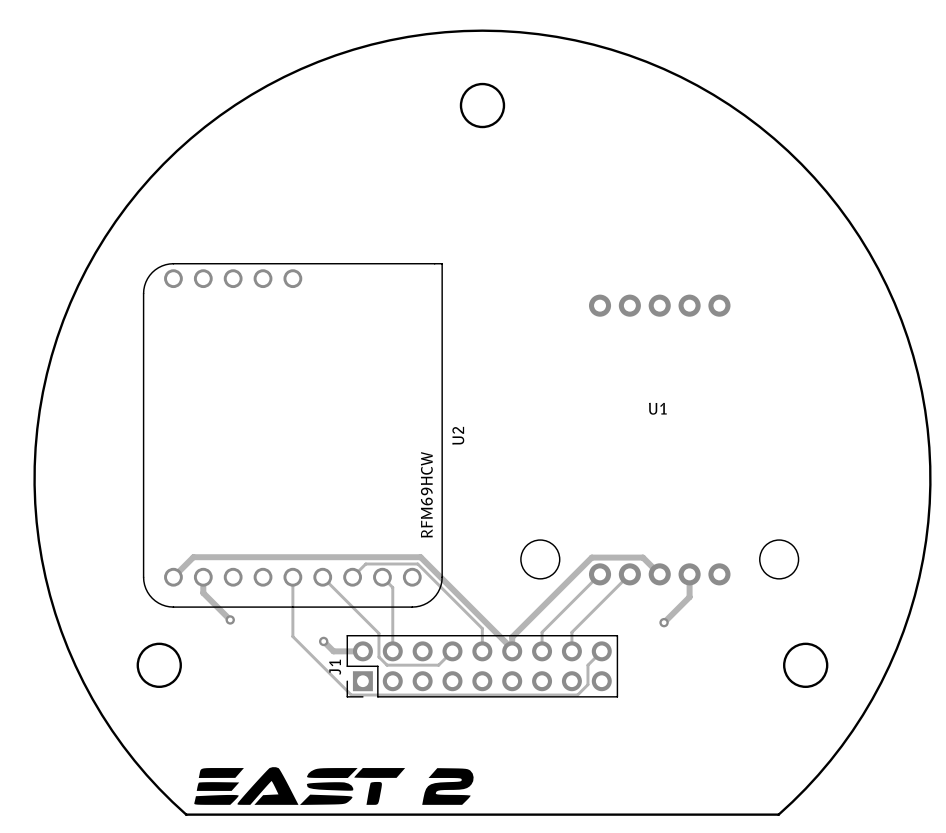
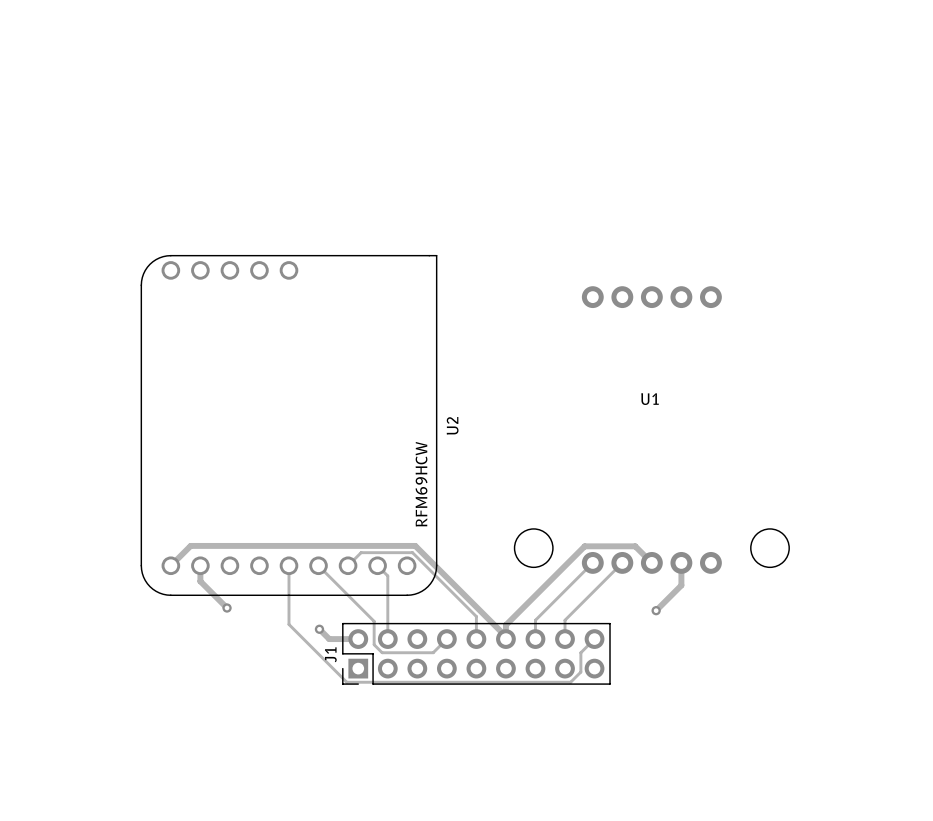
round board edge: [459, 82, 506, 129] -> none
round board edge: [136, 642, 182, 689] -> none
round board edge: [783, 642, 829, 689] -> none
drawing: [194, 767, 474, 805] -> none
board edge: (186, 814) (778, 814) (818, 775) (852, 730) (872, 699) (889, 665) (909, 613) (923, 559) (928, 522) (930, 484) (929, 447) (921, 392) (913, 355) (901, 320) (878, 269) (859, 236) (838, 206) (814, 177) (774, 138) (729, 104) (697, 85) (663, 69) (629, 55) (593, 44) (556, 36) (501, 31) (463, 31) (426, 34) (389, 40) (335, 55) (301, 69) (251, 94) (220, 115) (190, 138) (150, 177) (115, 221) (95, 252) (70, 302) (57, 337) (46, 373) (37, 428) (34, 466) (35, 503) (41, 559) (50, 595) (68, 648) (83, 682) (112, 730) (134, 760) (159, 788) (186, 814) -> none

